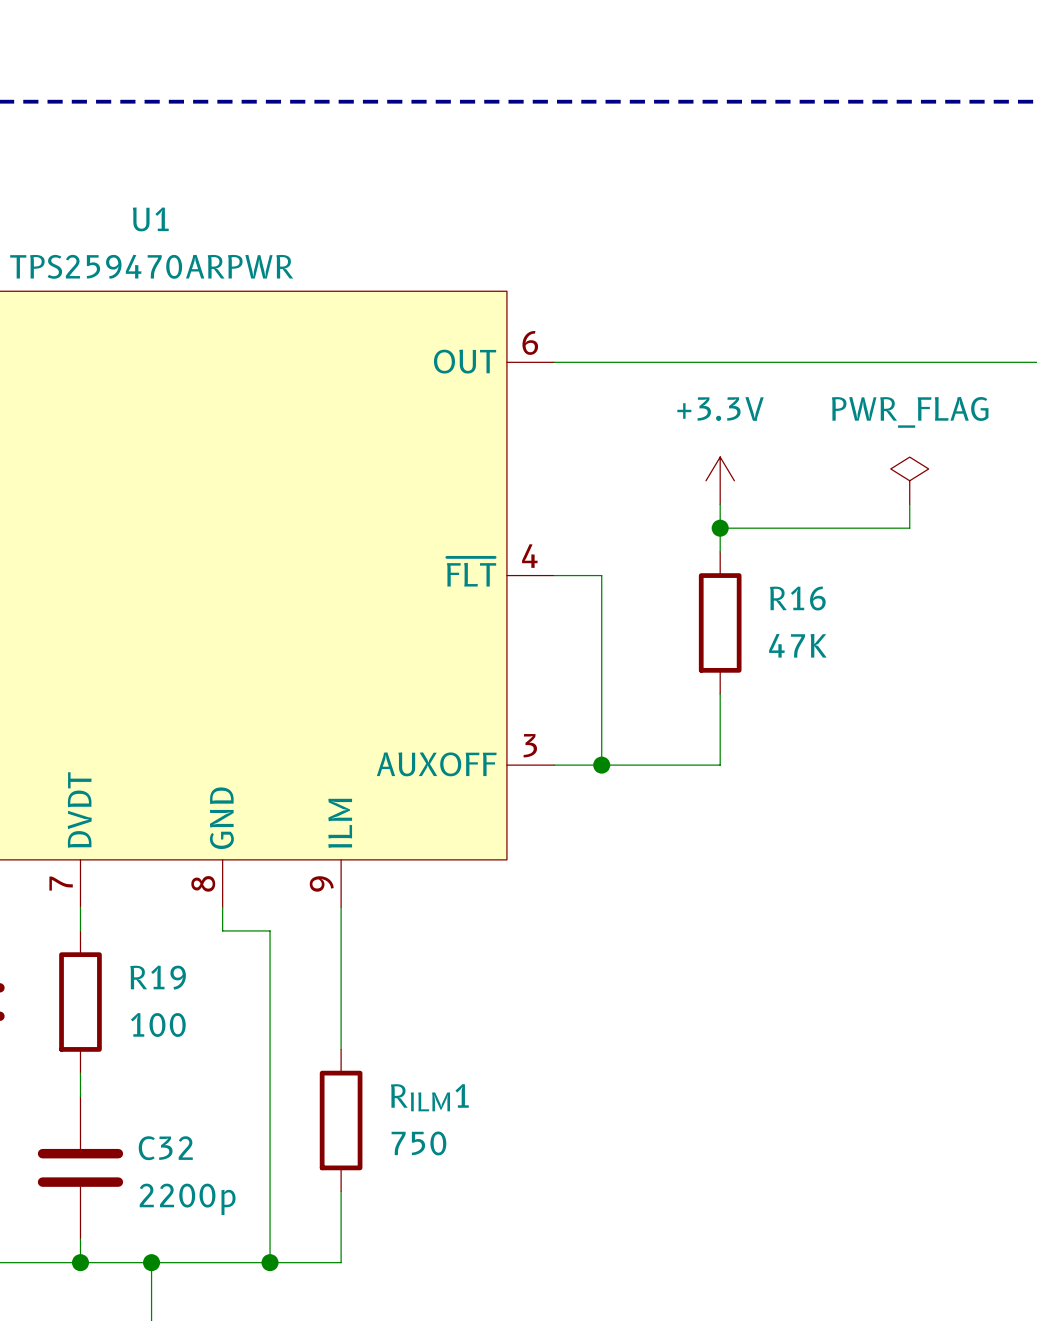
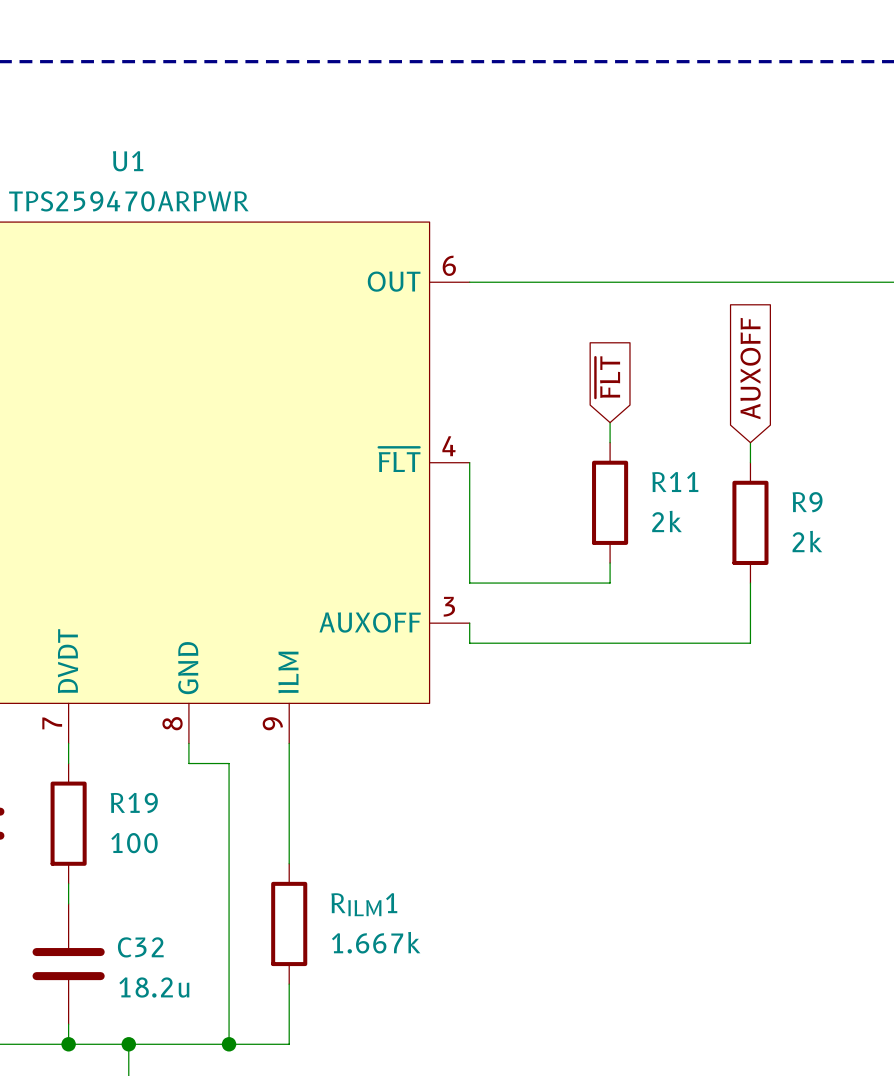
global label: none -> AUXOFF (750, 368)
global label: none -> ~{FLT} (607, 377)
power symbol: +3.3V (720, 480) -> none
power symbol: PWR_FLAG (909, 480) -> none
wire: (720, 504) (720, 528) (909, 528) (909, 504) -> none
junction: (720, 528) -> none
wire: none -> (750, 442) (750, 462)
wire: (554, 575) (601, 575) (601, 765) -> (469, 462) (469, 583) (610, 583)
R16 name: R16 (797, 598) -> R11 (675, 482)
R16 value: 47K (797, 645) -> 2k (667, 521)
R9: none -> 2k (750, 522)
wire: (720, 717) (720, 765) (554, 765) -> (750, 583) (750, 643) (469, 643) (469, 623)
junction: (601, 765) -> none
RILM1 value: 750 (418, 1143) -> 1.667k (376, 942)
C32 value: 2200p (187, 1199) -> 18.2u (154, 987)

